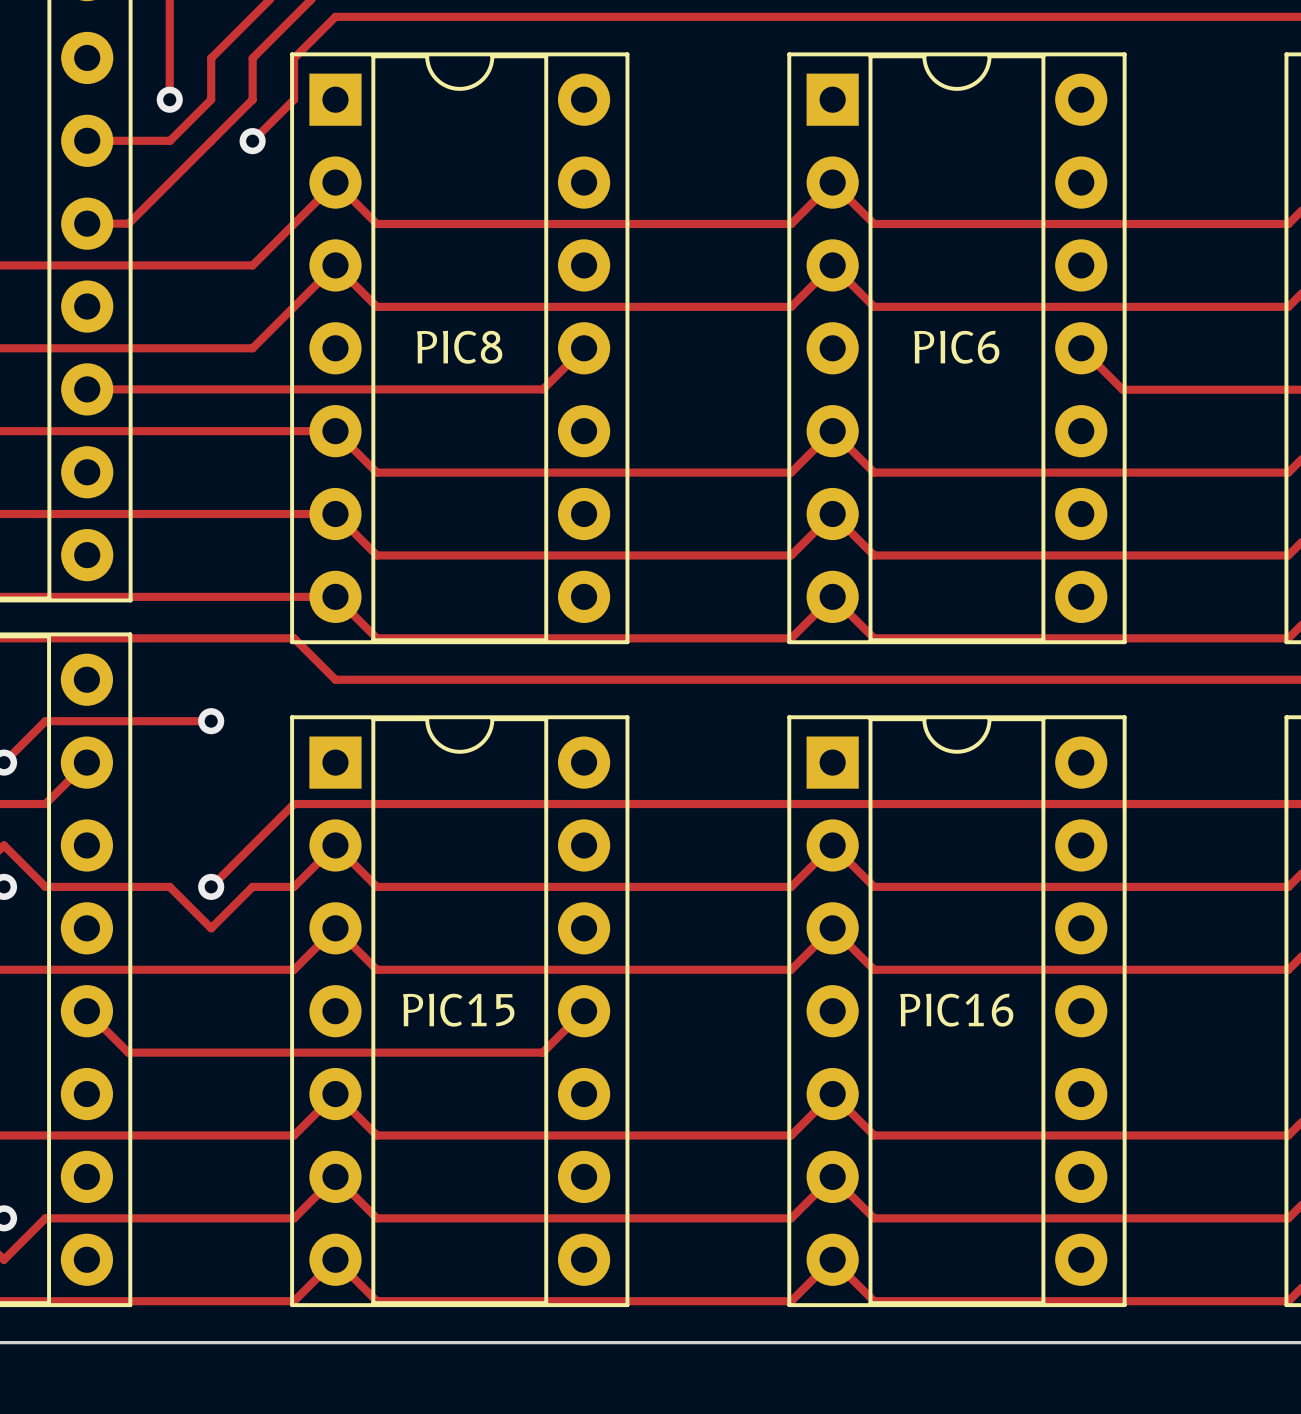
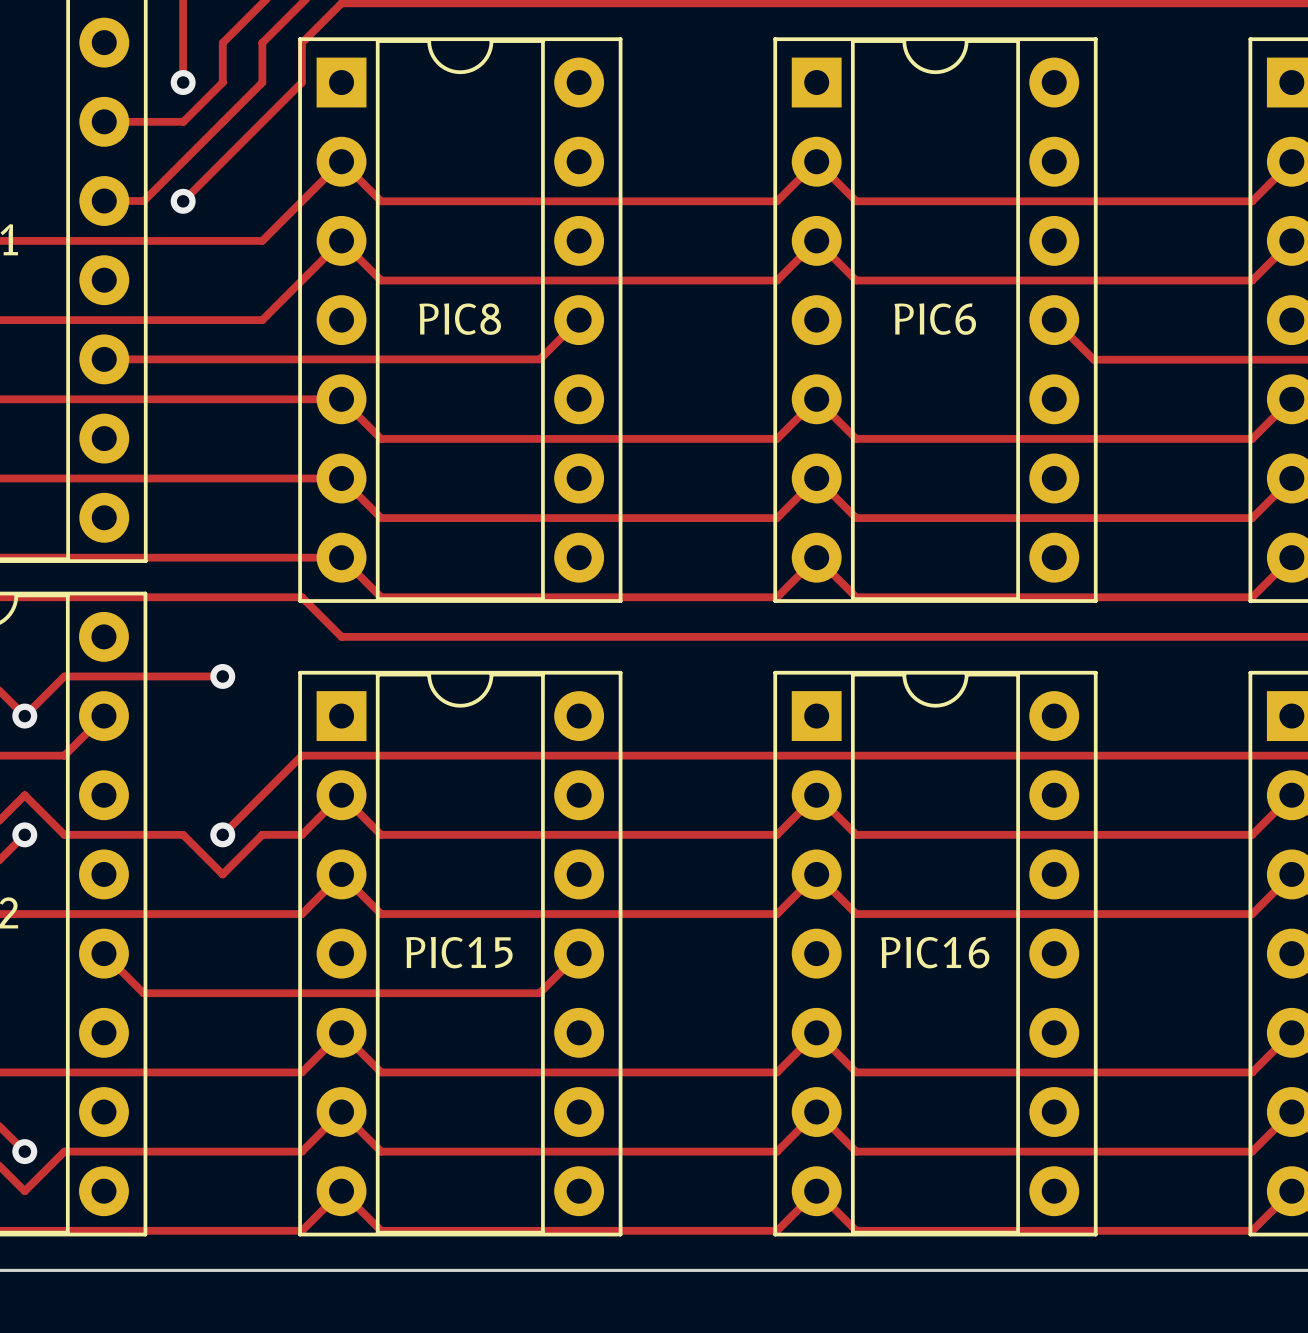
track: none -> (262, 122) (183, 201)
via position: (252, 141) -> (183, 201)

